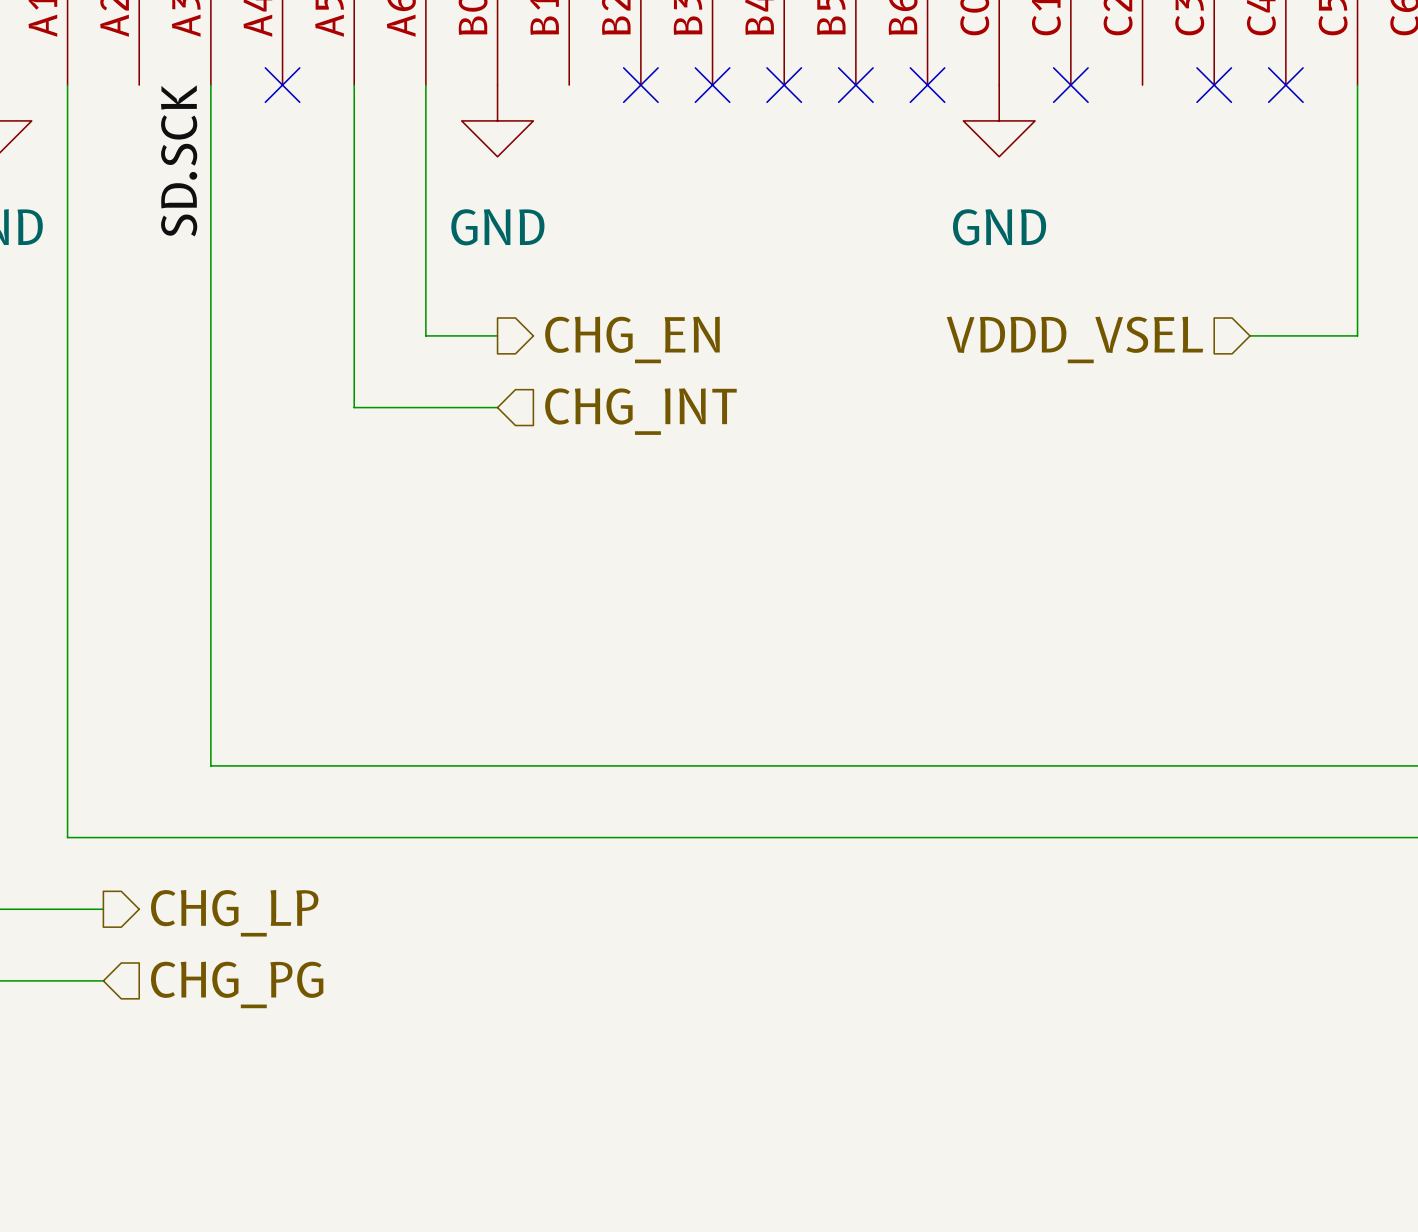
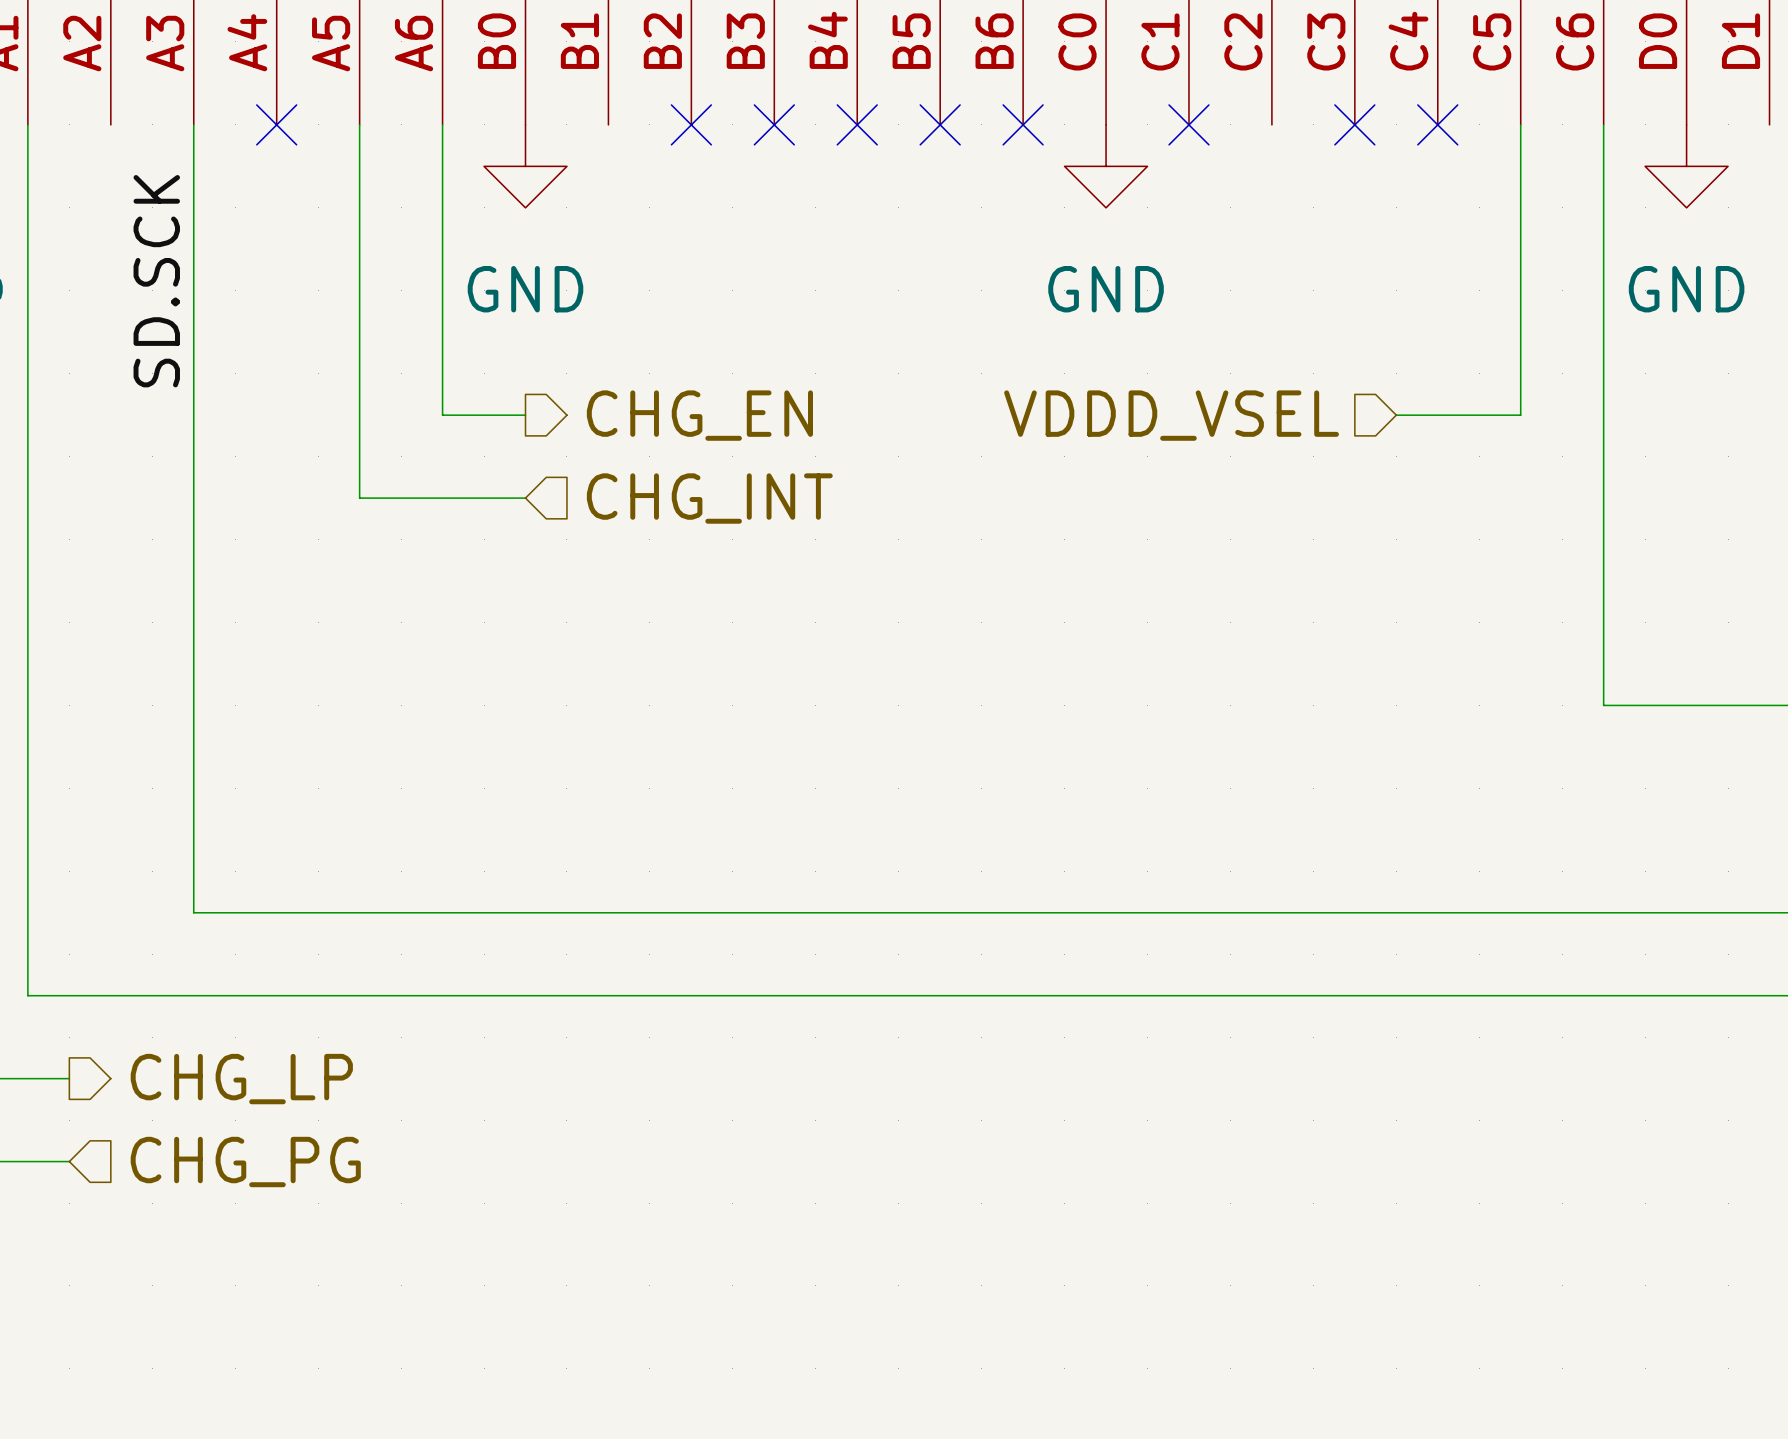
label position: SD.SCK (179, 160) -> SD.SCK (156, 281)

